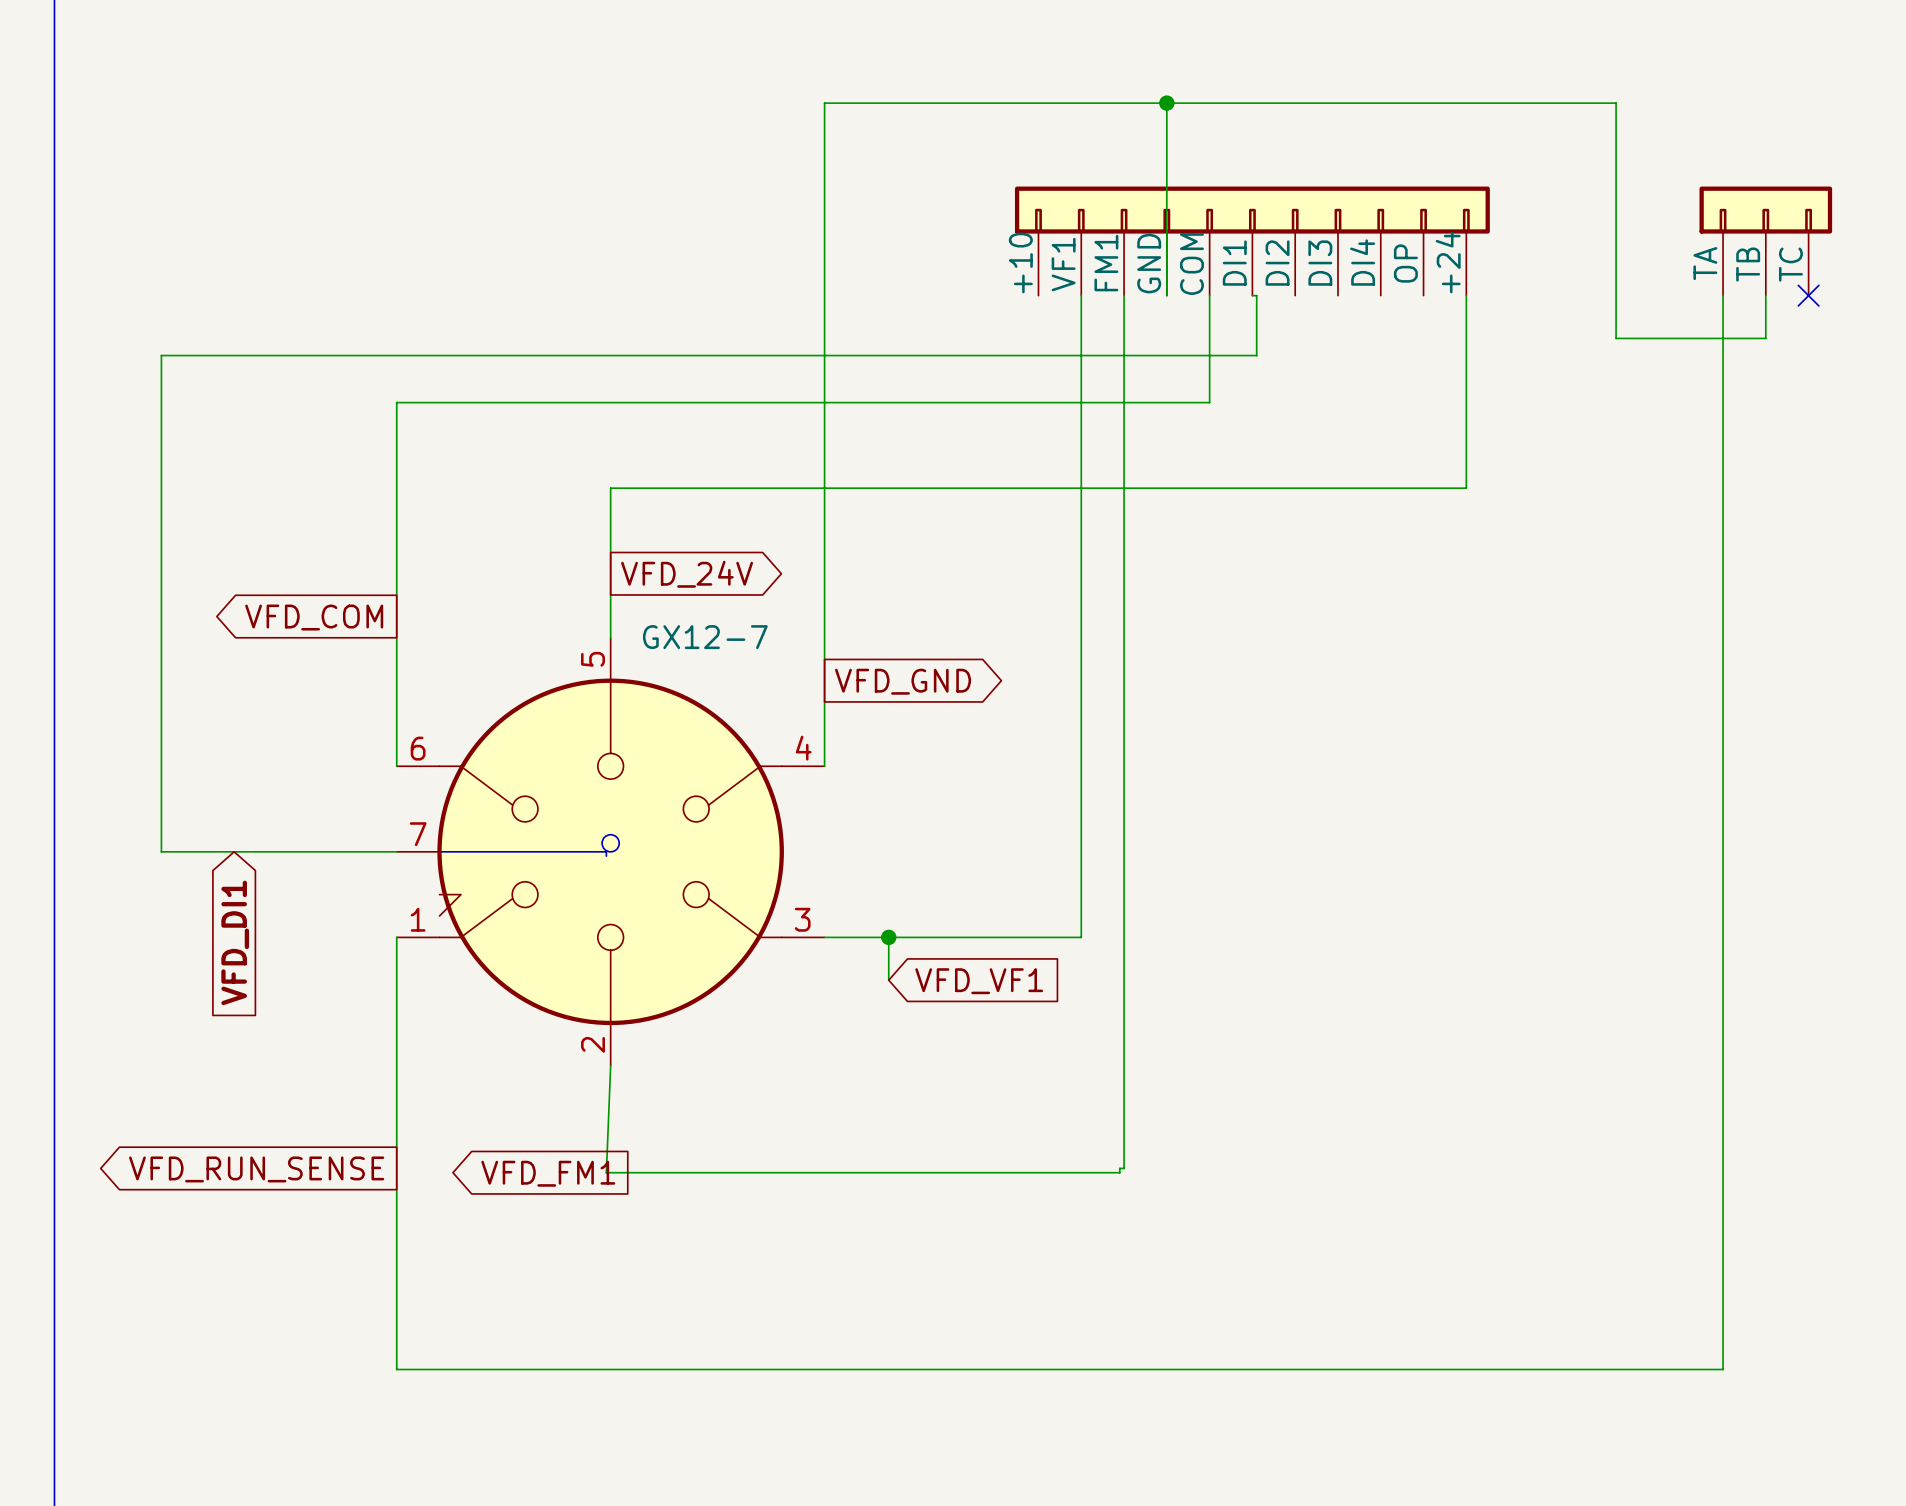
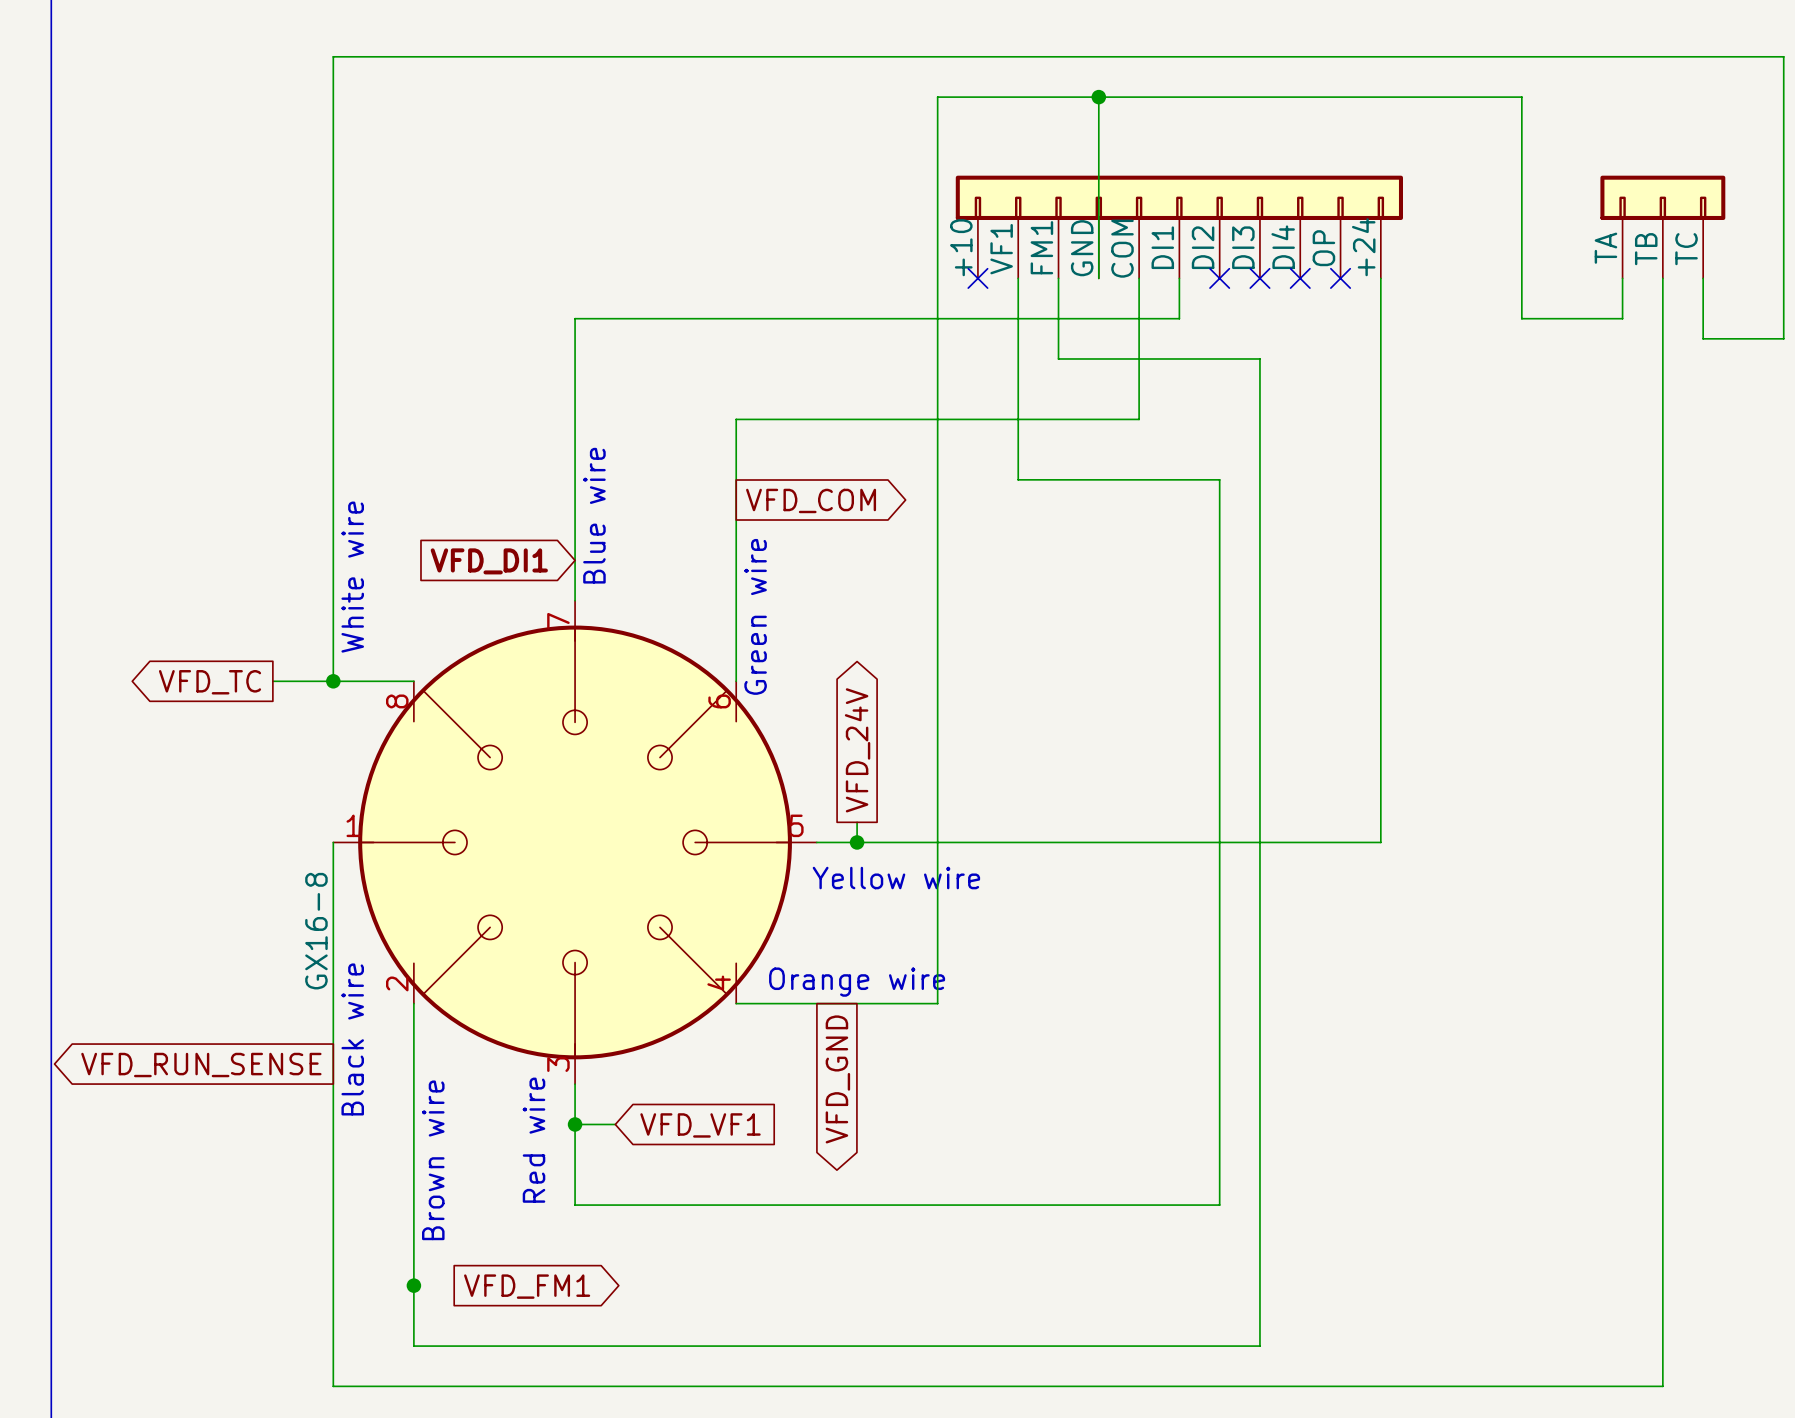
wire: (995, 103) (824, 103) (824, 766) -> (937, 97) (937, 1003) (736, 1003)
no-connect mark: none -> (977, 278)
wire: (1252, 295) (1256, 295) (1256, 355) (161, 355) (161, 851) (396, 851) -> none
no-connect mark: none -> (1219, 278)
no-connect mark: none -> (1259, 278)
no-connect mark: none -> (1300, 278)
no-connect mark: none -> (1340, 278)
wire: none -> (1703, 278) (1703, 338) (1783, 338) (1783, 56) (333, 56) (333, 681)
no-connect mark: (1808, 295) -> none
wire: (1765, 338) (1723, 338) (1723, 1369) (396, 1369) (396, 937) -> (1662, 318) (1662, 1386) (333, 1386) (333, 842)
wire: (1124, 381) (1124, 1168) (1119, 1168) (1119, 1172) (606, 1172) (610, 1065) -> (1058, 358) (1259, 358) (1259, 1346) (413, 1346) (413, 1003)
wire: (1209, 402) (396, 402) (396, 766) -> (1139, 379) (1139, 419) (736, 419) (736, 681)
wire: (610, 488) (1466, 488) -> (575, 459) (575, 318) (1179, 318) (1179, 278)
wire: none -> (1380, 459) (1380, 842) (816, 842)
wire: (1081, 509) (1081, 937) (824, 937) -> (1018, 479) (1219, 479) (1219, 1205) (575, 1205) (575, 1084)
text: none -> Blue wire (594, 515)
global label: VFD_24V (687, 574) -> none
global label: none -> VFD_DI1 (489, 561)
text: none -> White wire (352, 577)
global label rotation: 0° (314, 617) -> 180° (811, 500)
global label position: VFD_COM (314, 617) -> VFD_COM (811, 500)
text: none -> Green wire (755, 616)
global label rotation: 0° (903, 681) -> 90° clockwise (837, 1079)
global label position: VFD_GND (903, 681) -> VFD_GND (837, 1079)
wire: none -> (272, 681) (413, 681)
junction: none -> (333, 681)
global label: none -> VFD_TC (210, 682)
global label: none -> VFD_24V (857, 750)
drawing: [602, 834, 620, 852] -> none
line: (439, 851) (606, 851) (606, 856) -> none
part: GX12-7 (610, 851) -> none
wire: none -> (857, 822) (857, 842)
part: none -> GX16-8 (575, 842)
text: none -> Yellow wire (896, 878)
wire: (888, 937) (888, 980) -> none
junction position: (888, 937) -> (857, 842)
global label: VFD_DI1 (235, 942) -> none
global label position: VFD_VF1 (979, 981) -> VFD_VF1 (700, 1125)
text: none -> Orange wire (857, 982)
text: none -> Black wire (352, 1039)
global label position: VFD_RUN_SENSE (256, 1169) -> VFD_RUN_SENSE (201, 1065)
global label rotation: 0° (548, 1173) -> 180° (527, 1286)
wire: none -> (575, 1124) (615, 1124)
junction: none -> (575, 1124)
text: none -> Red wire (534, 1140)
text: none -> Brown wire (433, 1160)
junction: none -> (413, 1285)

